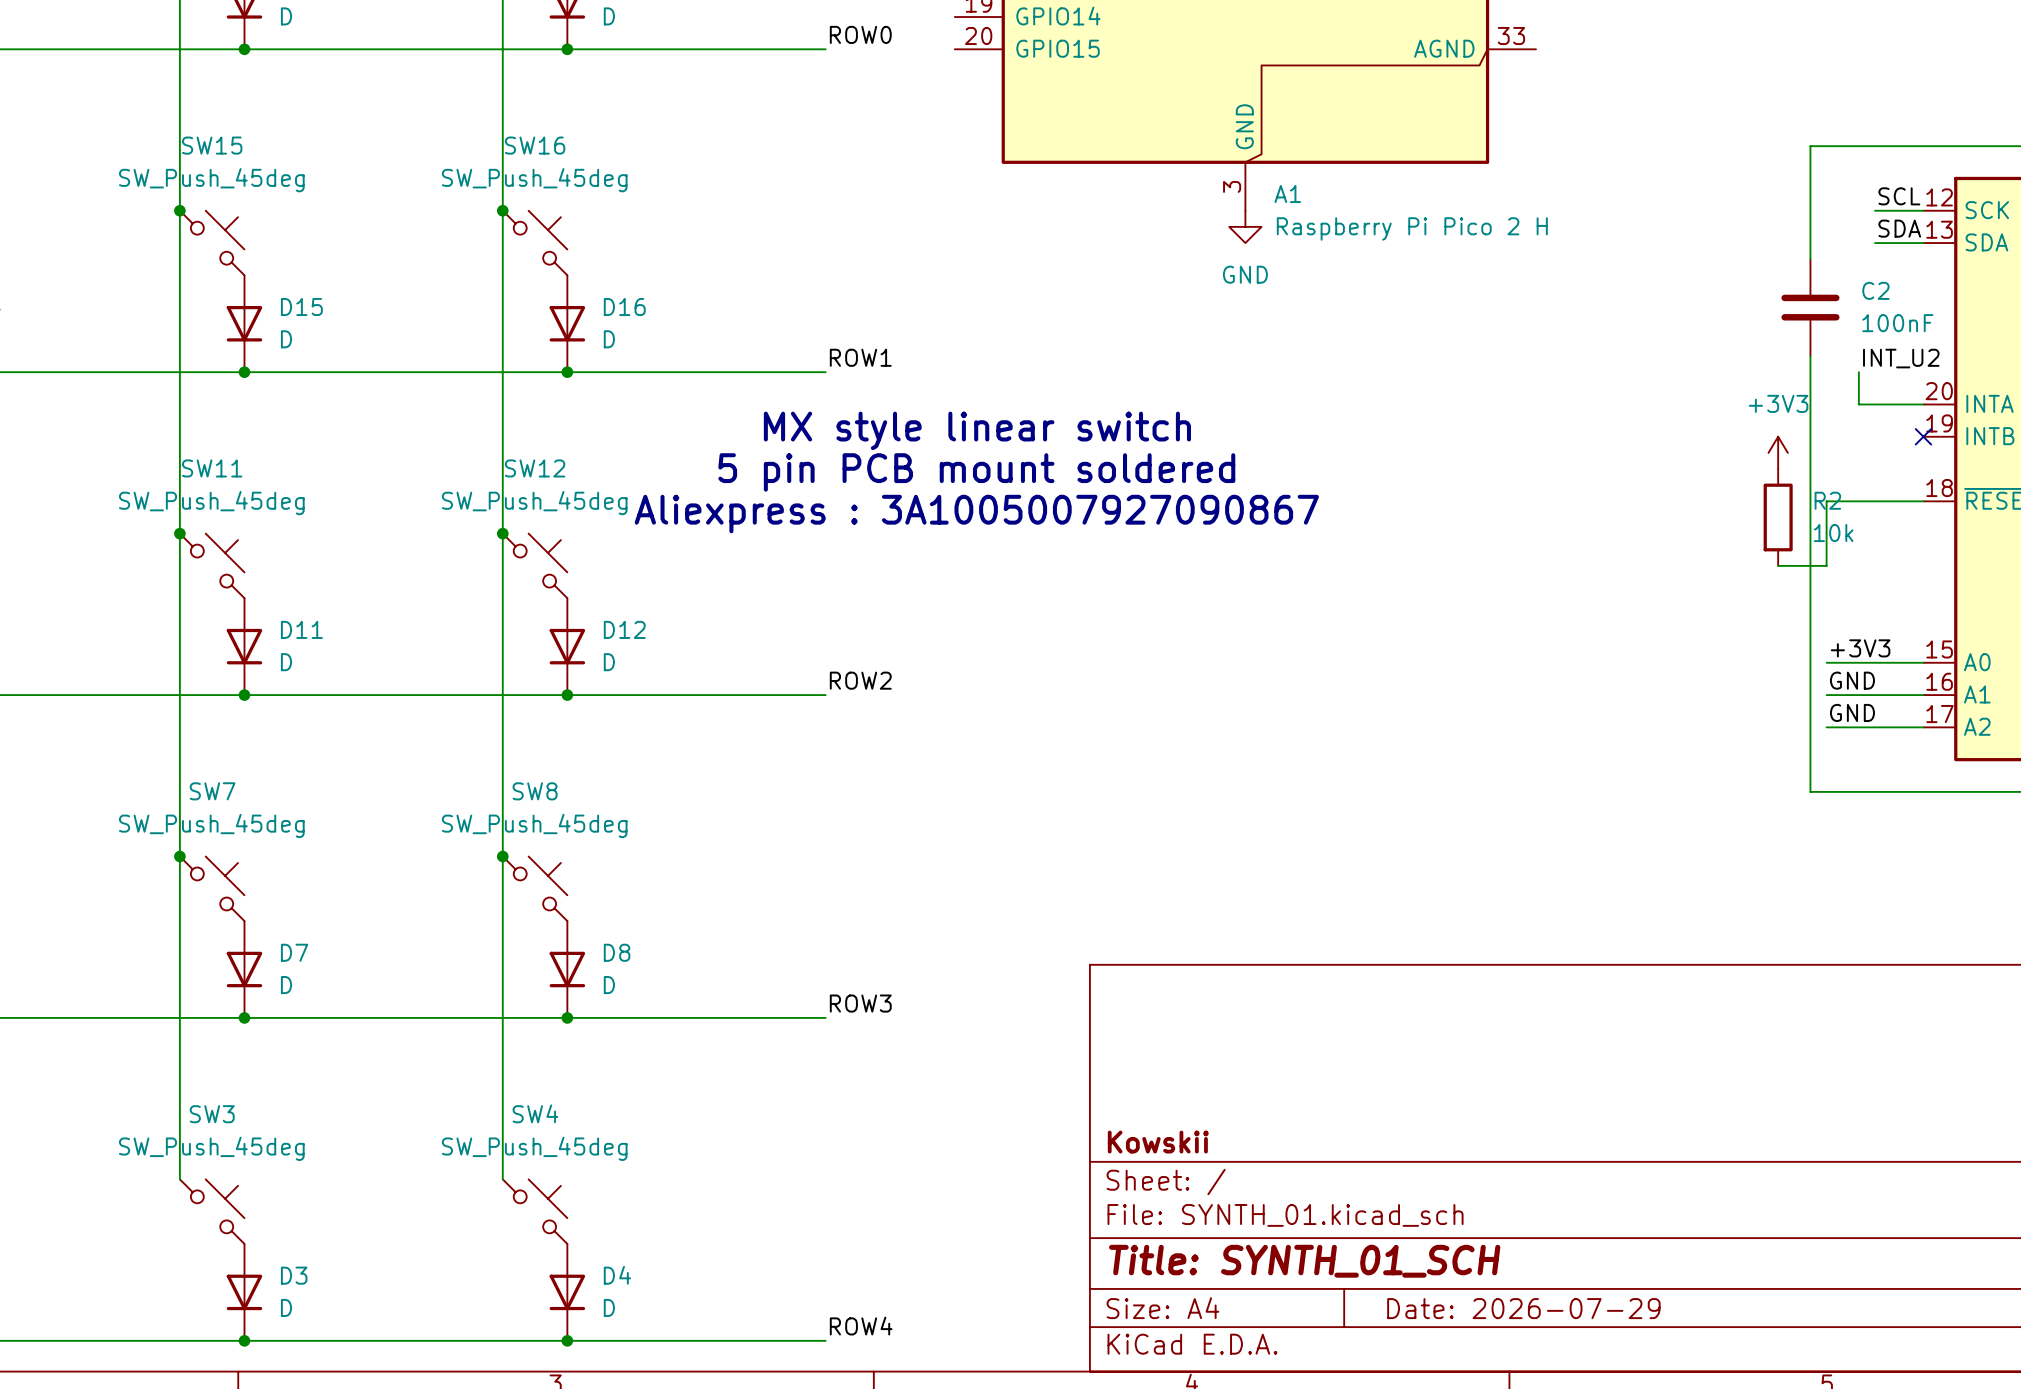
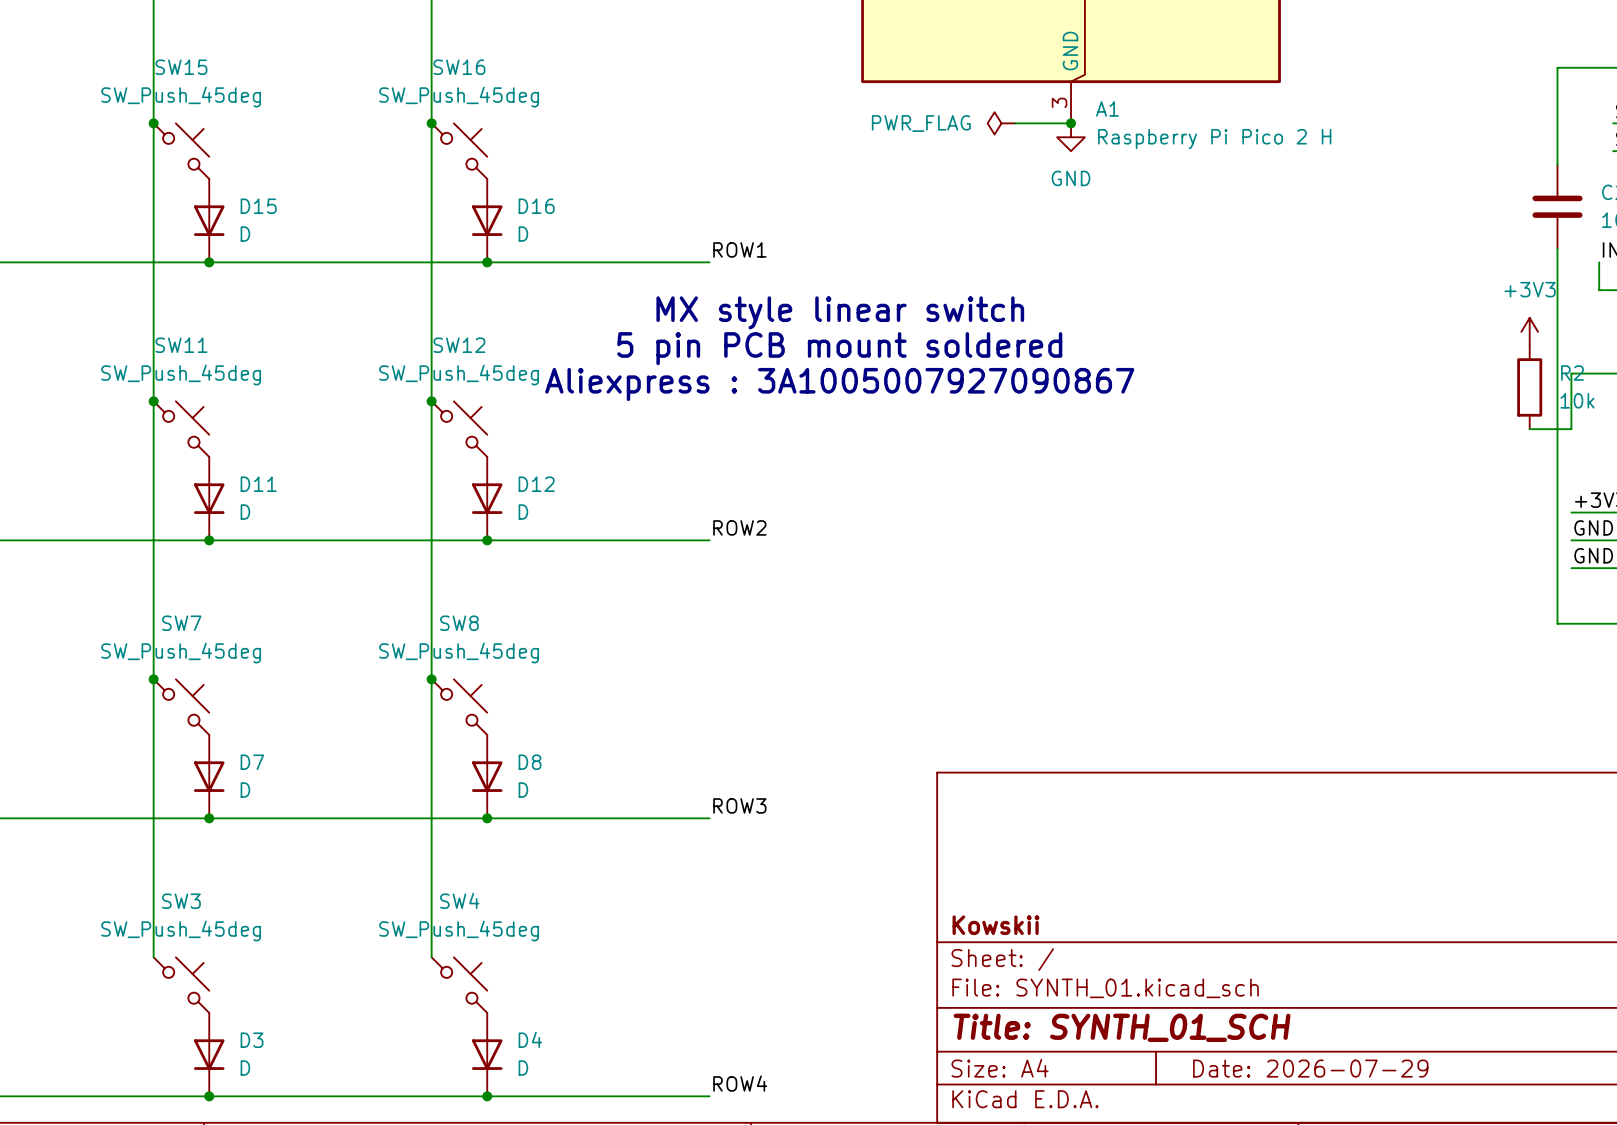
power symbol: none -> PWR_FLAG (1001, 123)
wire: none -> (1015, 123) (1071, 123)
junction: none -> (1071, 123)

